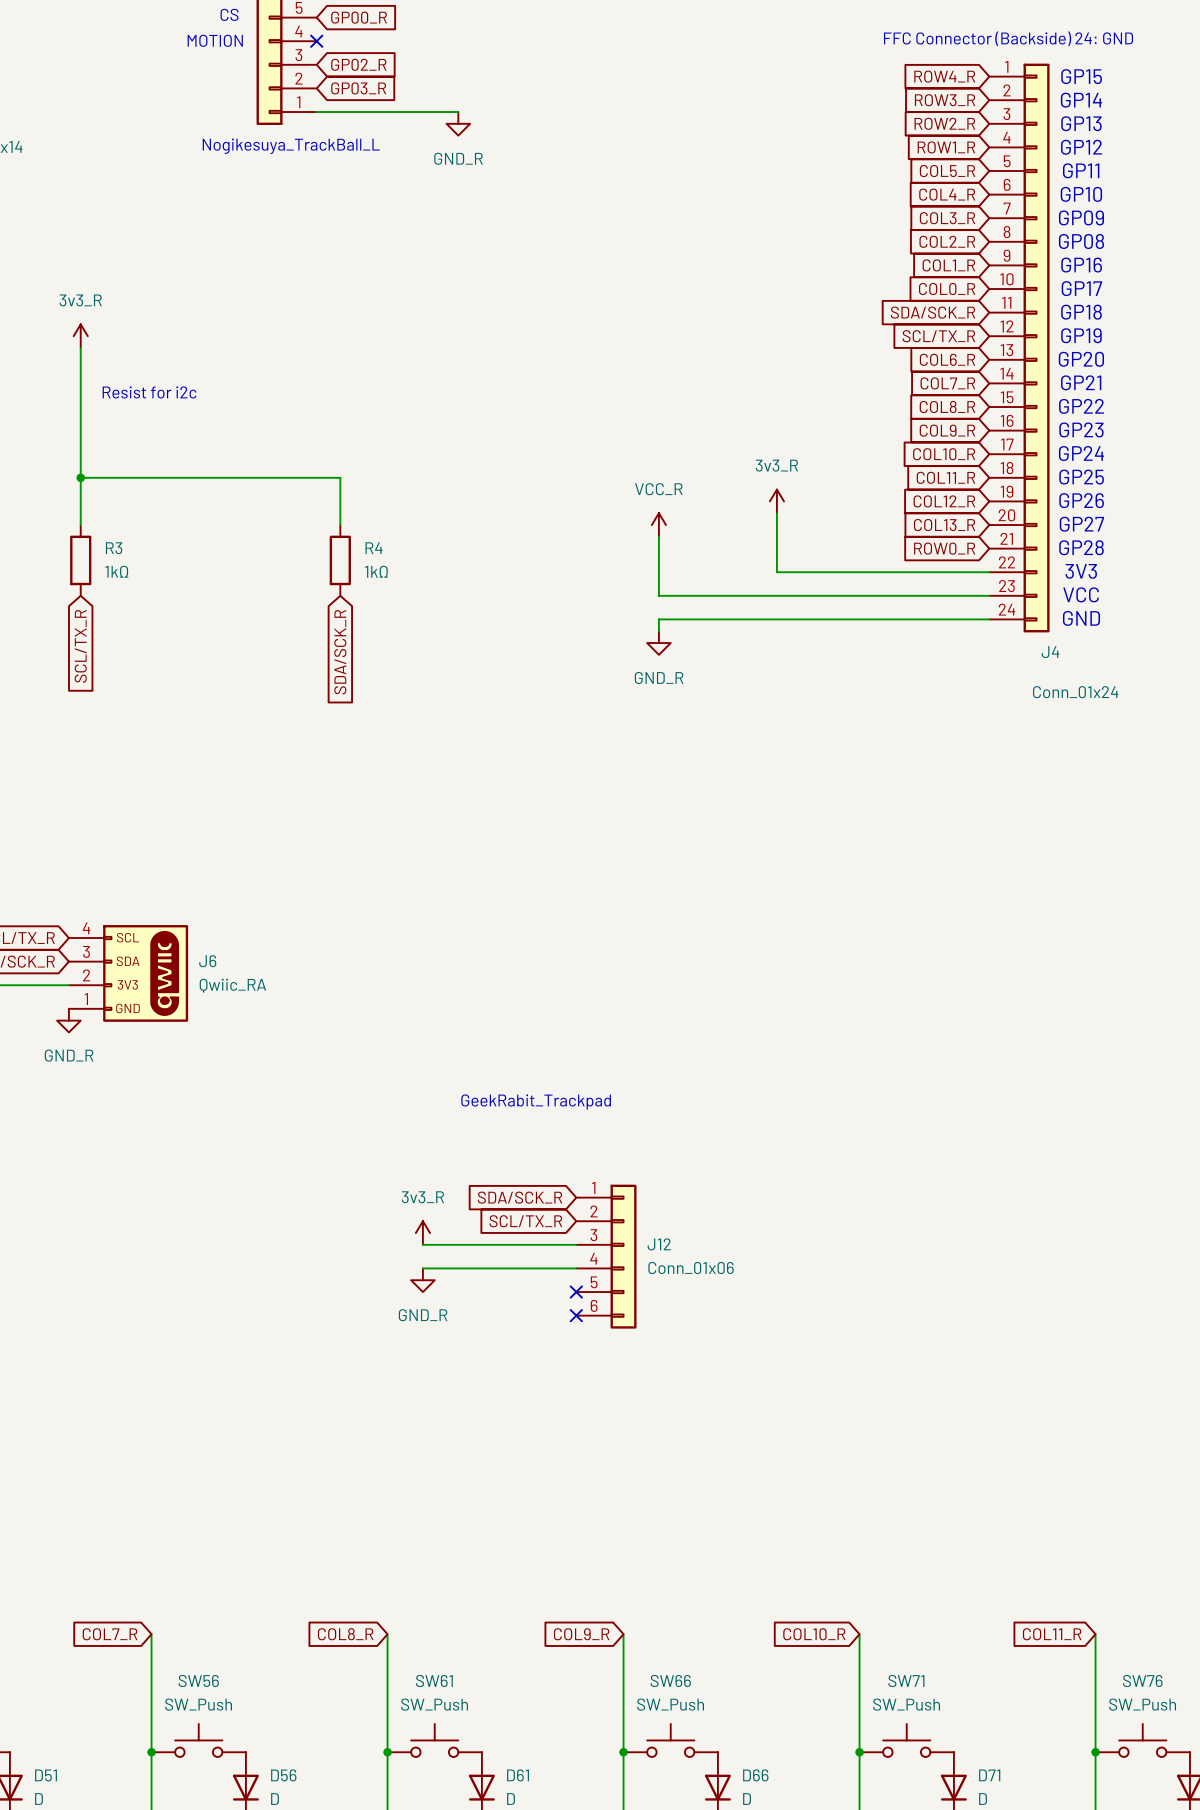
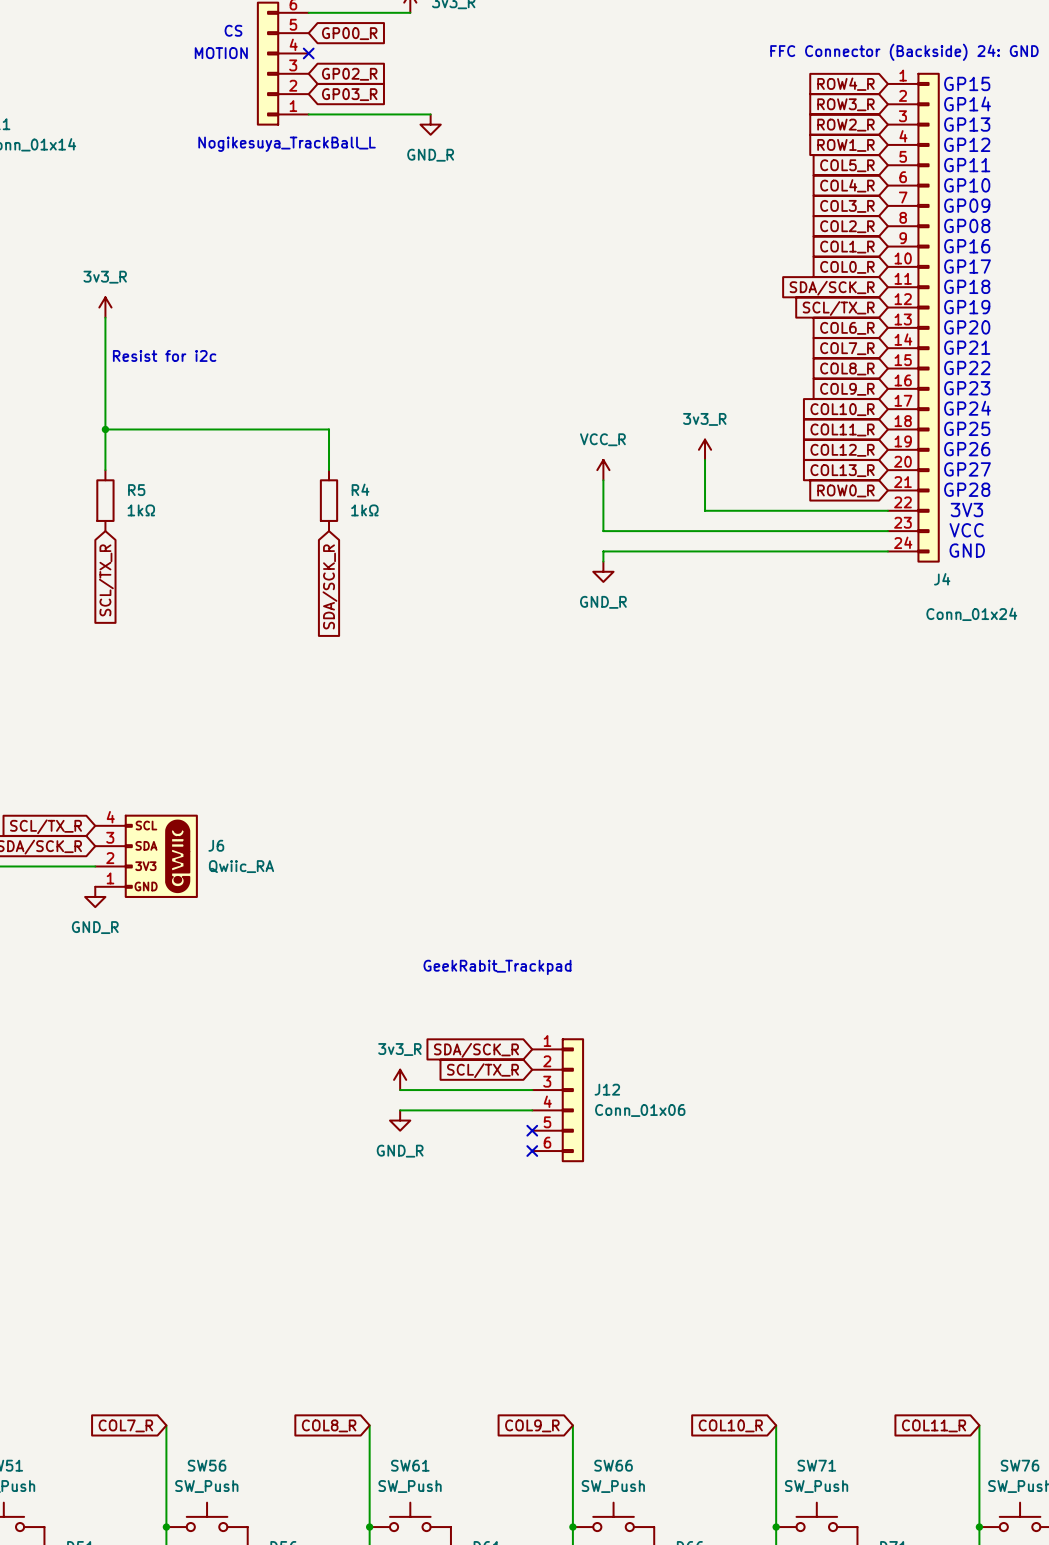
R3 name: R3 (114, 548) -> R5 (136, 490)

